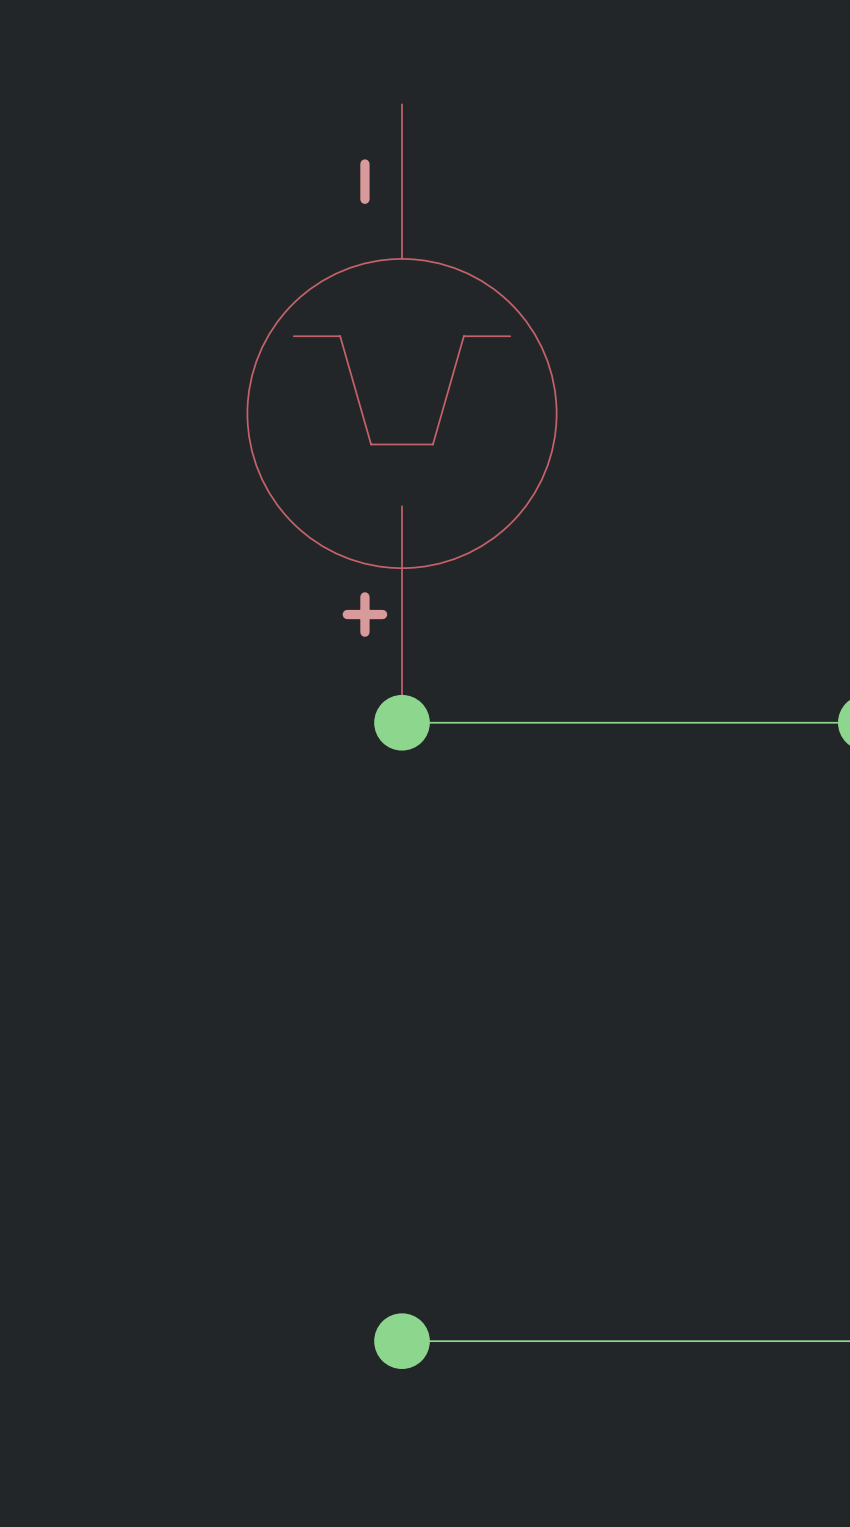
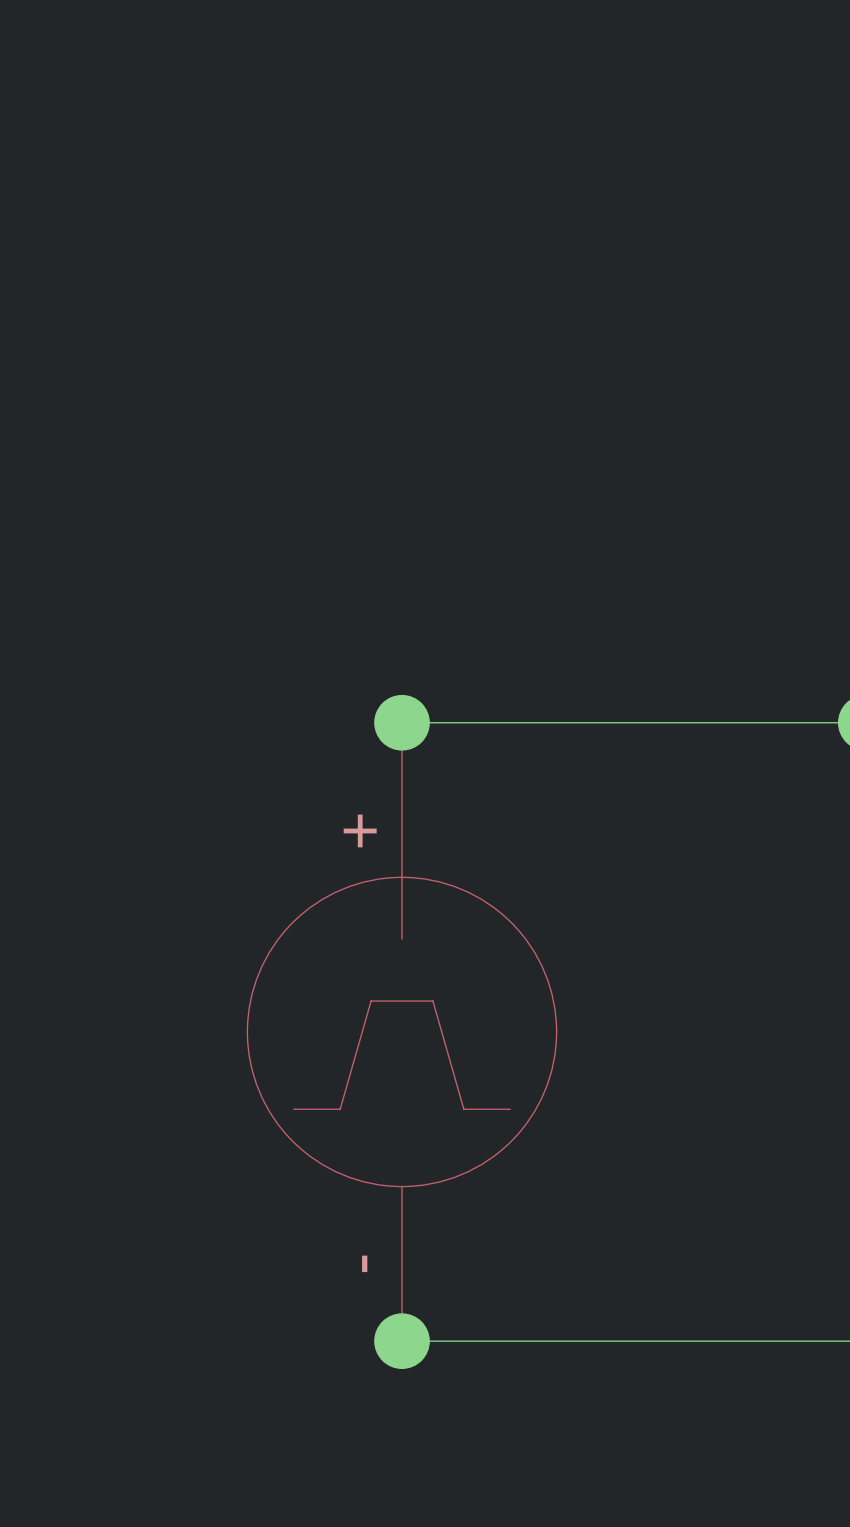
part rotation: 0° (402, 413) -> 180° (402, 1031)
part position: (402, 413) -> (402, 1031)

